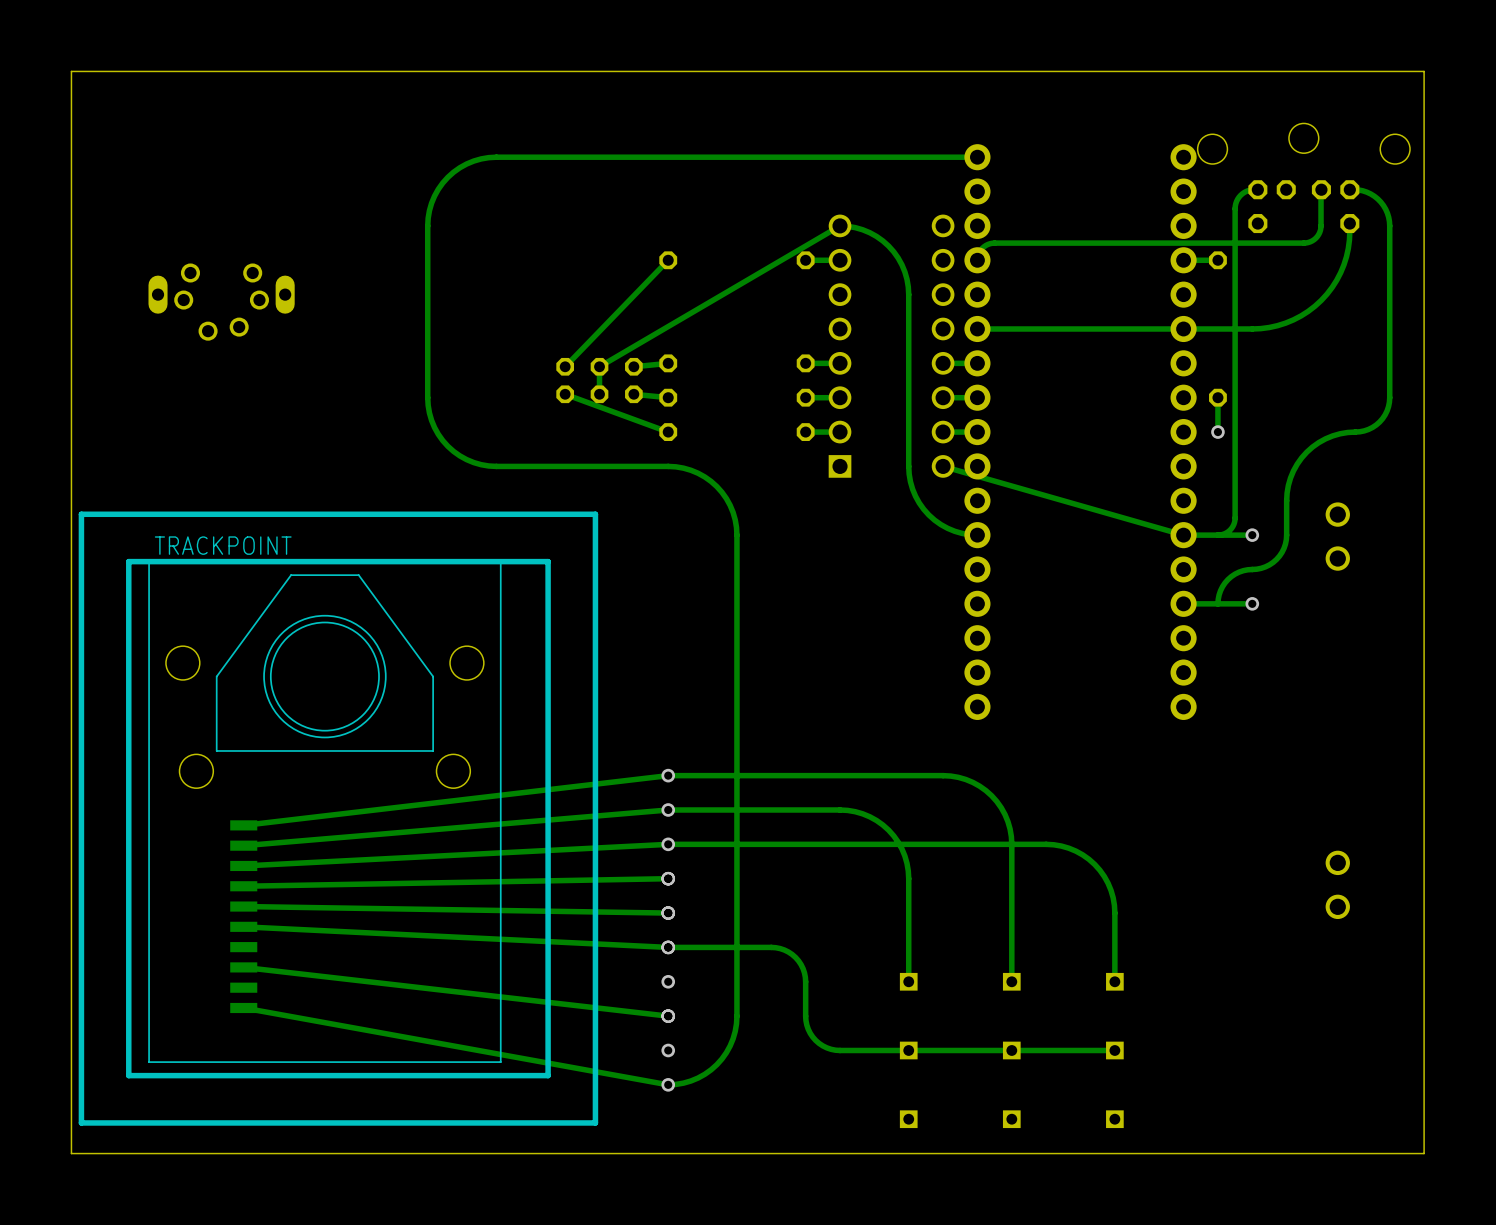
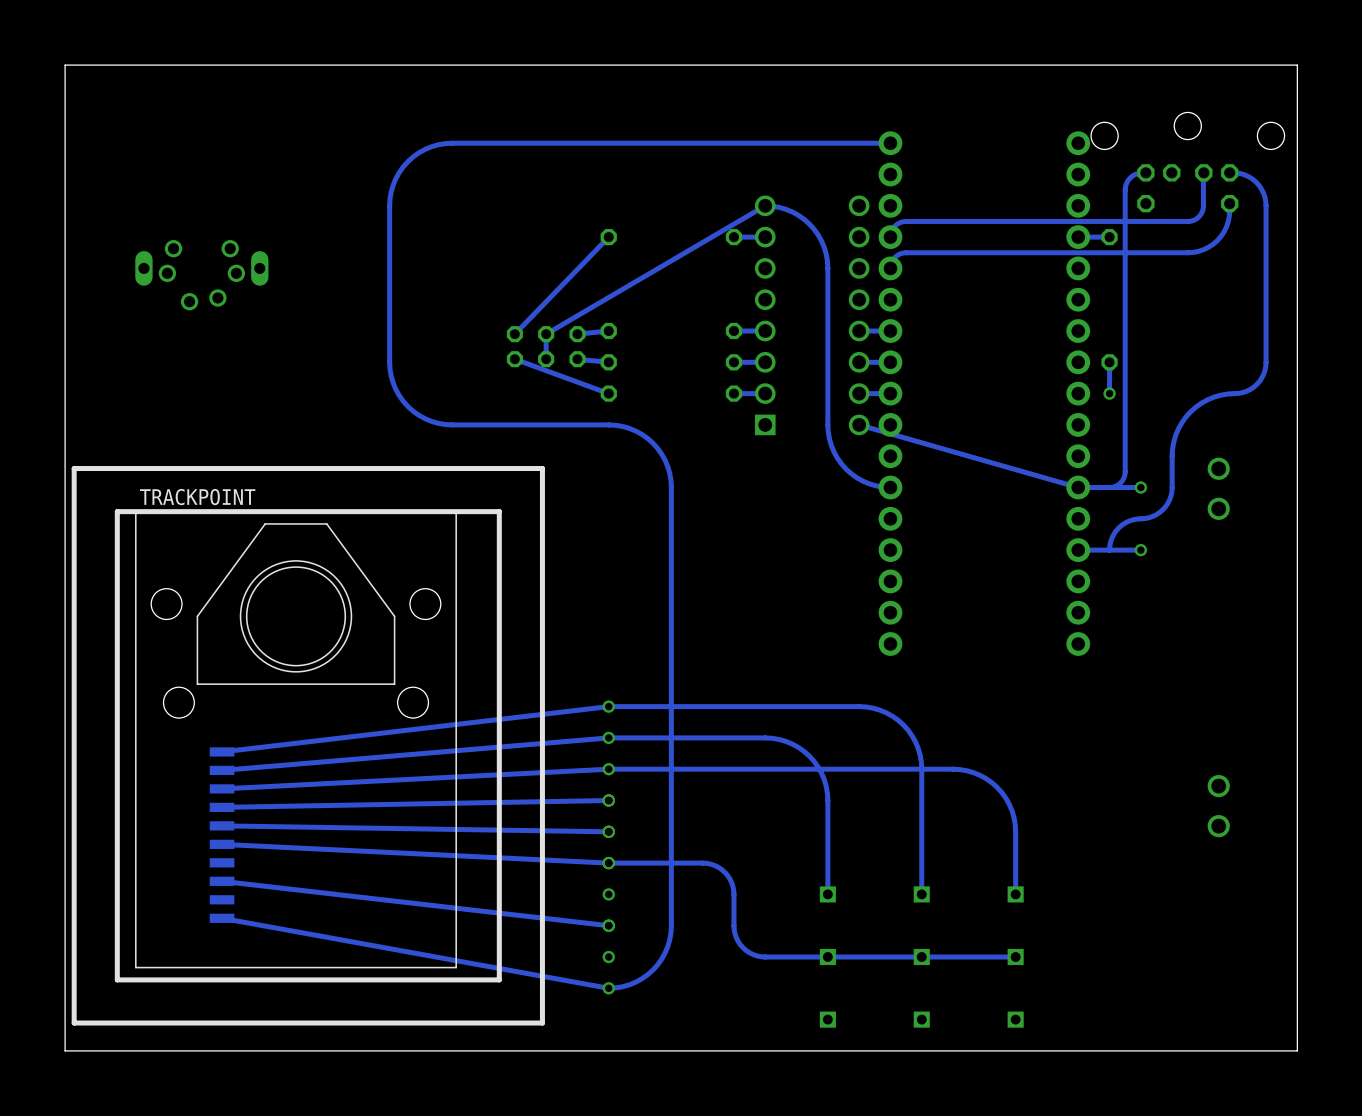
track: (1349, 231) (1346, 256) (1332, 287) (1308, 311) (1277, 325) (1252, 328) (977, 328) -> (1229, 210) (1226, 226) (1217, 240) (1203, 249) (1193, 252) (906, 252) (895, 257) (890, 268)

